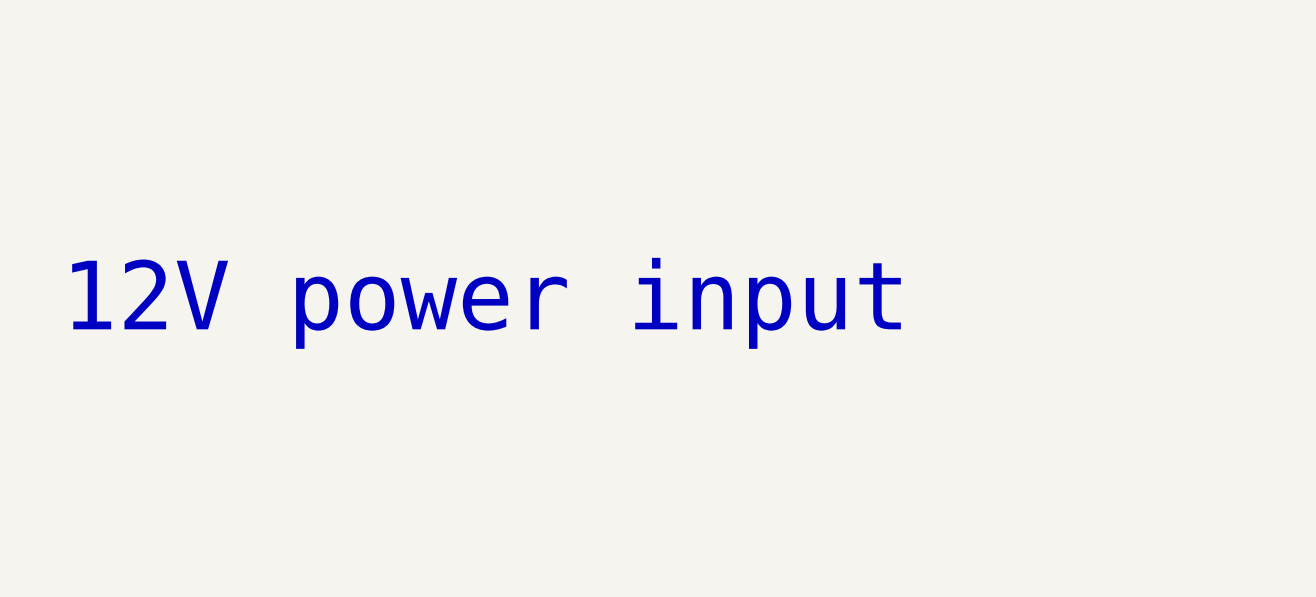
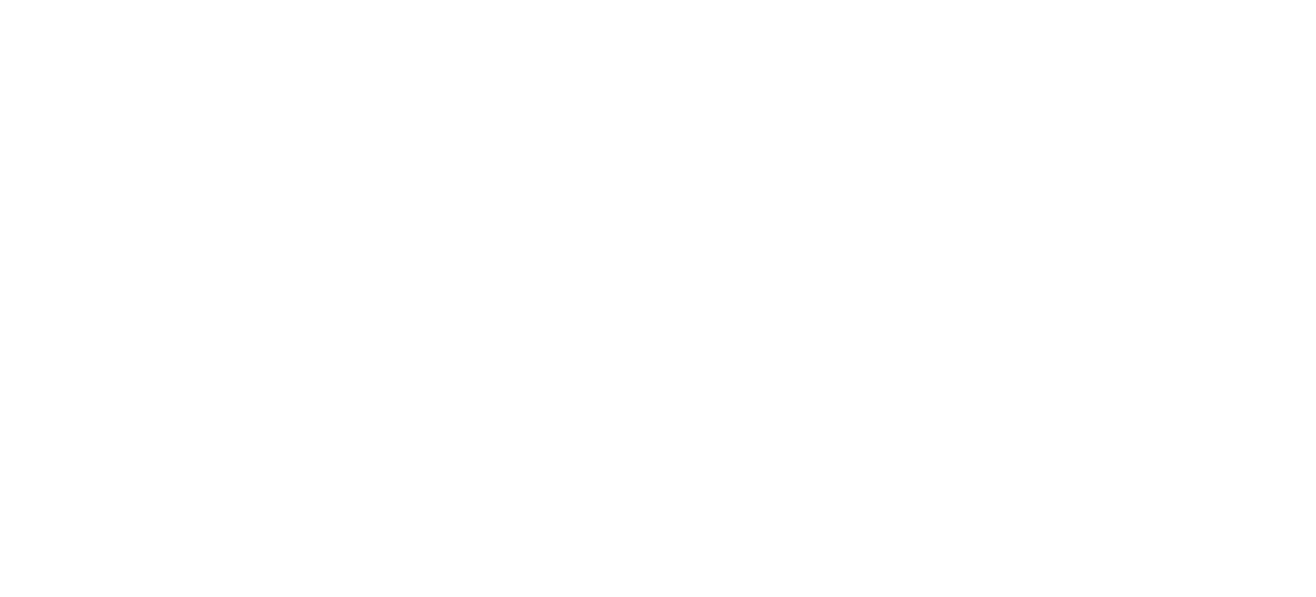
text: 12V power input (486, 303) -> none

